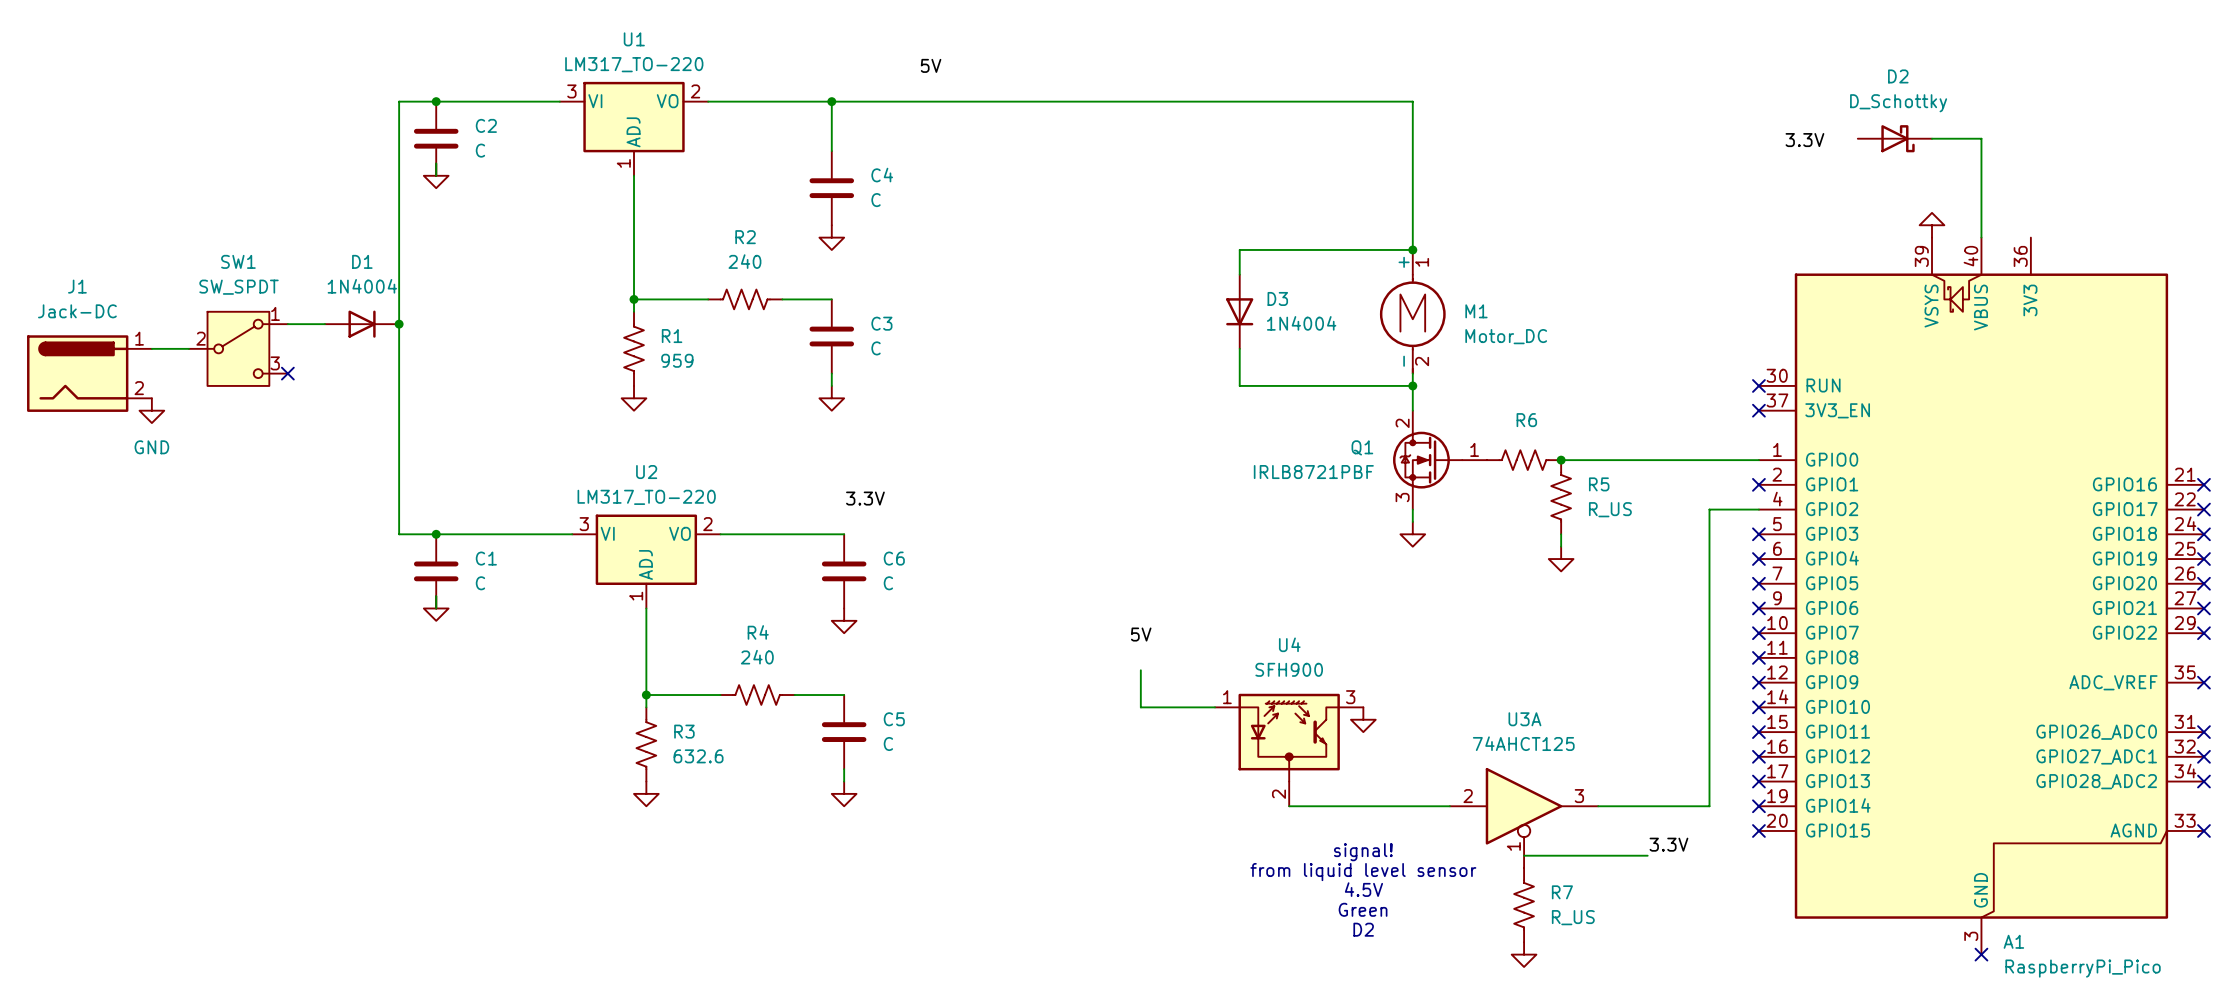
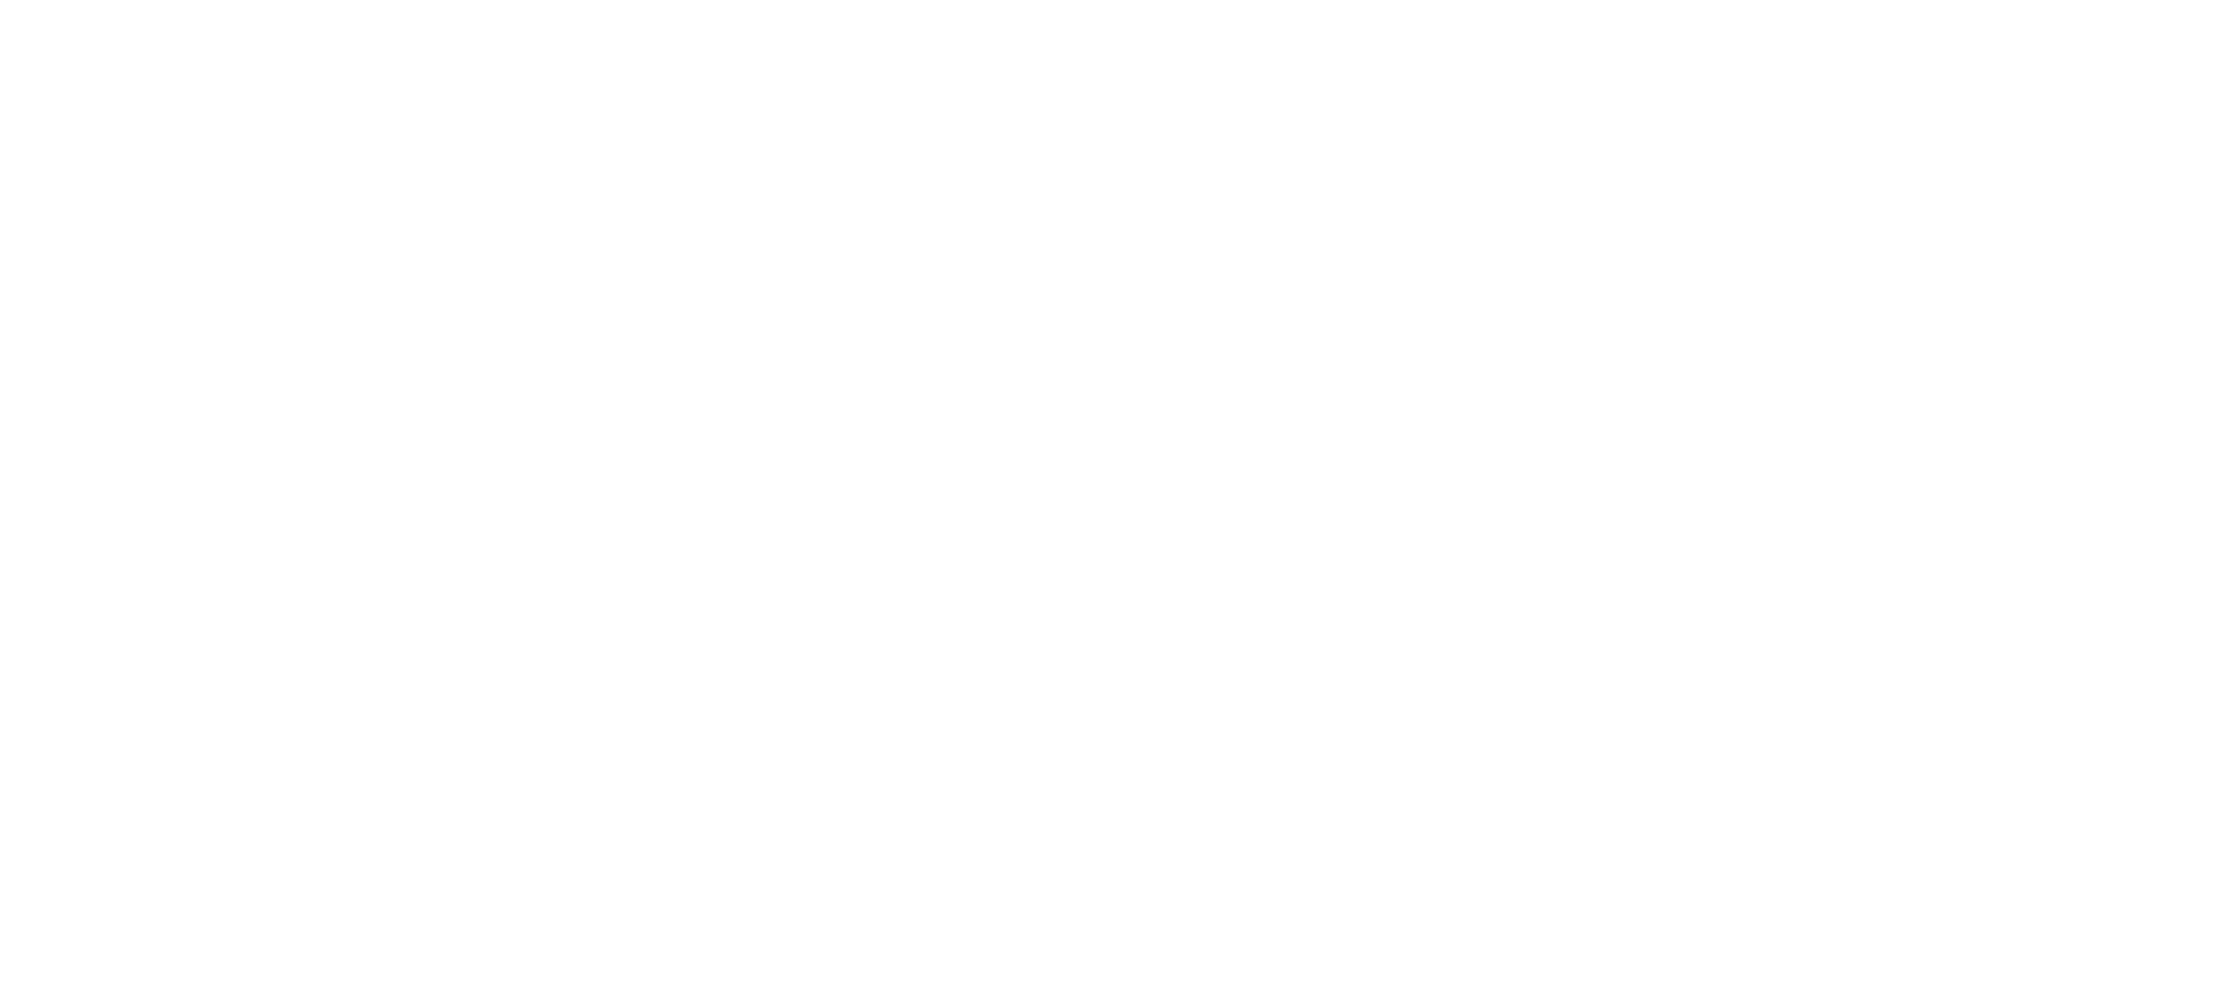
label: 5V (931, 65) -> none
junction: (436, 101) -> none
wire: (559, 101) (399, 101) (399, 534) (572, 534) -> none
wire: (708, 101) (1412, 101) (1412, 249) (1239, 249) (1239, 274) -> none
wire: (831, 101) (831, 151) -> none
junction: (831, 101) -> none
U1: LM317_TO-220 (634, 128) -> none
C2: C (436, 138) -> none
D2: D_Schottky (1894, 138) -> none
wire: (1932, 138) (1981, 138) (1981, 237) -> none
label: 3.3V (1804, 140) -> none
wire: (436, 163) (436, 175) -> none
power symbol: (436, 175) -> none
wire: (634, 175) (634, 311) -> none
C4: C (831, 188) -> none
power symbol: (1932, 225) -> none
power symbol: (831, 237) -> none
junction: (1412, 249) -> none
wire: (634, 299) (708, 299) -> none
junction: (634, 299) -> none
R2: 240 (745, 299) -> none
wire: (782, 299) (831, 299) -> none
D3: 1N4004 (1239, 311) -> none
M1: Motor_DC (1412, 311) -> none
wire: (287, 324) (324, 324) -> none
D1: 1N4004 (362, 324) -> none
junction: (399, 324) -> none
C3: C (831, 336) -> none
wire: (151, 348) (188, 348) -> none
SW1: SW_SPDT (238, 348) -> none
R1: 959 (634, 348) -> none
wire: (1239, 348) (1239, 385) (1412, 385) -> none
J1: Jack-DC (89, 373) -> none
no-connect mark: (287, 373) -> none
wire: (831, 373) (831, 385) -> none
wire: (1412, 373) (1412, 410) -> none
junction: (1412, 385) -> none
no-connect mark: (1758, 385) -> none
power symbol: (634, 398) -> none
power symbol: (831, 398) -> none
power symbol: GND (151, 410) -> none
no-connect mark: (1758, 410) -> none
Q1: IRLB8721PBF (1440, 460) -> none
R6: (1524, 460) -> none
wire: (1561, 460) (1758, 460) -> none
junction: (1561, 460) -> none
no-connect mark: (1758, 484) -> none
no-connect mark: (2203, 484) -> none
R5: R_US (1561, 497) -> none
label: 3.3V (865, 498) -> none
wire: (1412, 509) (1412, 521) -> none
wire: (1758, 509) (1709, 509) (1709, 806) (1598, 806) -> none
no-connect mark: (2203, 509) -> none
junction: (436, 534) -> none
wire: (720, 534) (844, 534) -> none
power symbol: (1412, 534) -> none
wire: (1561, 534) (1561, 546) -> none
no-connect mark: (1758, 534) -> none
no-connect mark: (2203, 534) -> none
power symbol: (1561, 559) -> none
no-connect mark: (1758, 559) -> none
no-connect mark: (2203, 559) -> none
U2: LM317_TO-220 (646, 561) -> none
C1: C (436, 571) -> none
C6: C (844, 571) -> none
no-connect mark: (1758, 583) -> none
no-connect mark: (2203, 583) -> none
wire: (436, 596) (436, 608) -> none
A1: RaspberryPi_Pico (1981, 596) -> none
power symbol: (436, 608) -> none
wire: (646, 608) (646, 707) -> none
no-connect mark: (1758, 608) -> none
no-connect mark: (2203, 608) -> none
power symbol: (844, 620) -> none
no-connect mark: (1758, 633) -> none
no-connect mark: (2203, 633) -> none
label: 5V (1141, 634) -> none
no-connect mark: (1758, 657) -> none
wire: (1140, 670) (1140, 707) (1215, 707) -> none
no-connect mark: (1758, 682) -> none
no-connect mark: (2203, 682) -> none
wire: (646, 695) (720, 695) -> none
junction: (646, 695) -> none
R4: 240 (757, 695) -> none
wire: (794, 695) (844, 695) -> none
no-connect mark: (1758, 707) -> none
power symbol: (1363, 719) -> none
C5: C (844, 732) -> none
no-connect mark: (1758, 732) -> none
no-connect mark: (2203, 732) -> none
R3: 632.6 (646, 744) -> none
U4: SFH900 (1289, 750) -> none
no-connect mark: (1758, 756) -> none
no-connect mark: (2203, 756) -> none
wire: (844, 769) (844, 781) -> none
no-connect mark: (1758, 781) -> none
no-connect mark: (2203, 781) -> none
power symbol: (646, 793) -> none
power symbol: (844, 793) -> none
wire: (1289, 806) (1449, 806) -> none
no-connect mark: (1758, 806) -> none
U3A: 74AHCT125 (1524, 818) -> none
no-connect mark: (1758, 830) -> none
no-connect mark: (2203, 830) -> none
label: 3.3V (1668, 844) -> none
text: signal! (1363, 852) -> none
wire: (1524, 855) (1647, 855) -> none
text: from liquid level sensor (1363, 872) -> none
text: 4.5V (1363, 889) -> none
R7: R_US (1524, 905) -> none
text: Green (1363, 909) -> none
text: D2 (1363, 929) -> none
power symbol: (1524, 954) -> none
no-connect mark: (1981, 954) -> none

